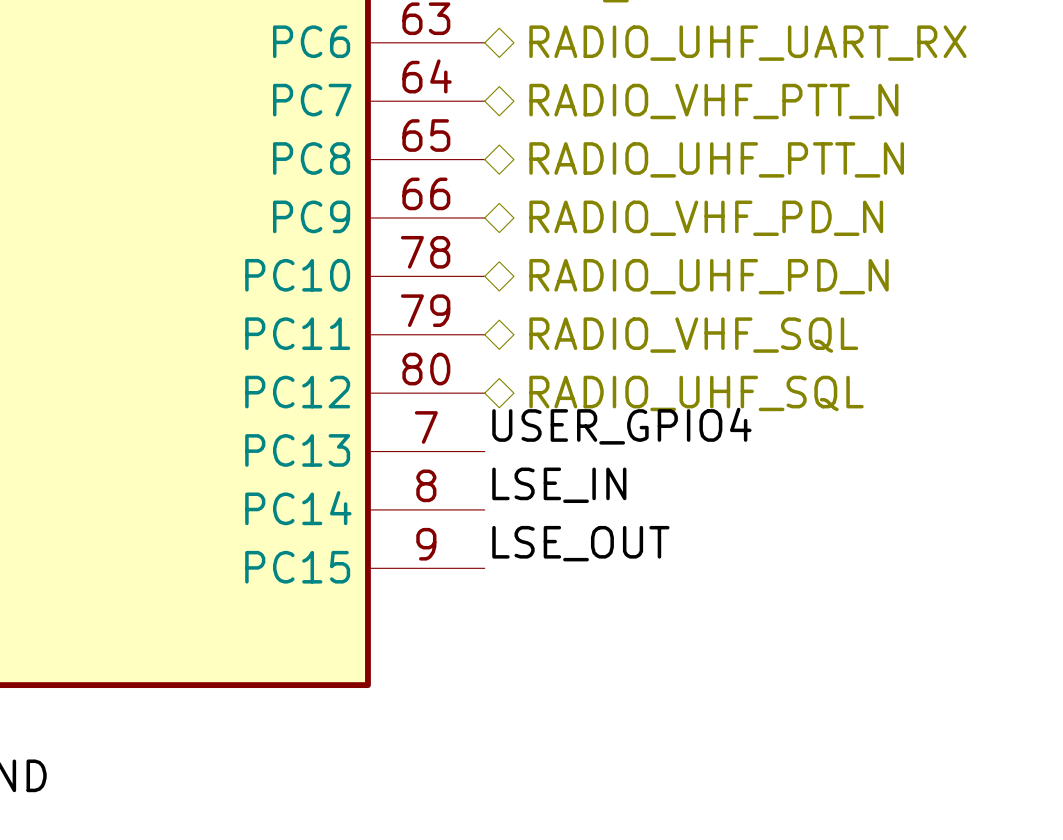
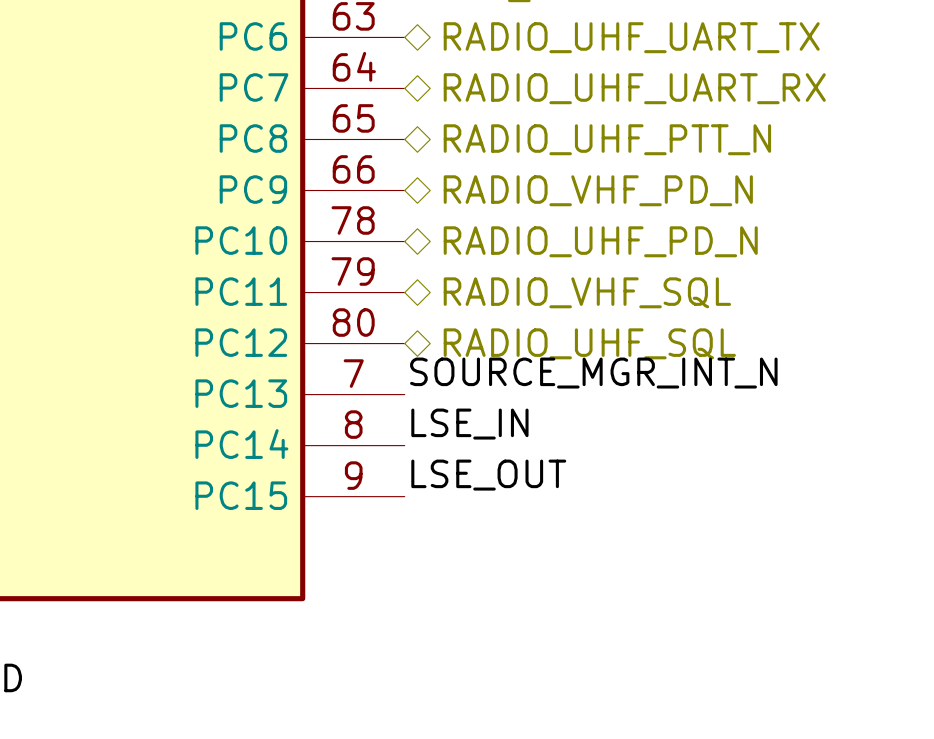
hierarchical label: RADIO_UHF_UART_RX (747, 43) -> RADIO_UHF_UART_TX (631, 37)
hierarchical label: RADIO_VHF_PTT_N (713, 101) -> RADIO_UHF_UART_RX (634, 88)
label: USER_GPIO4 (621, 426) -> SOURCE_MGR_INT_N (593, 373)

